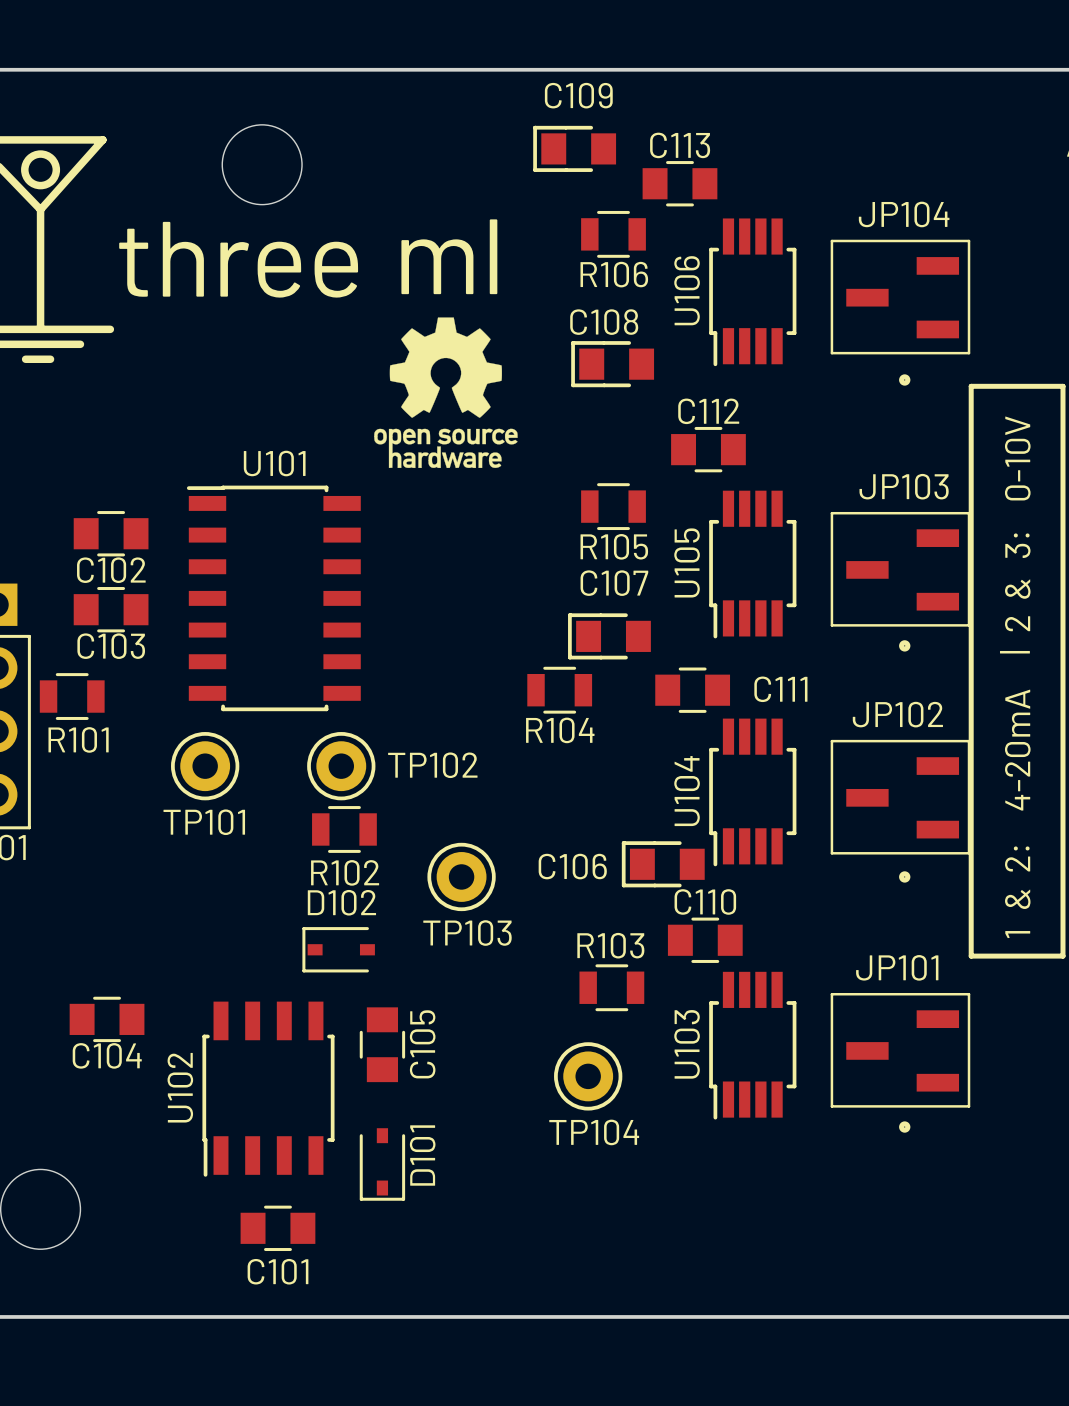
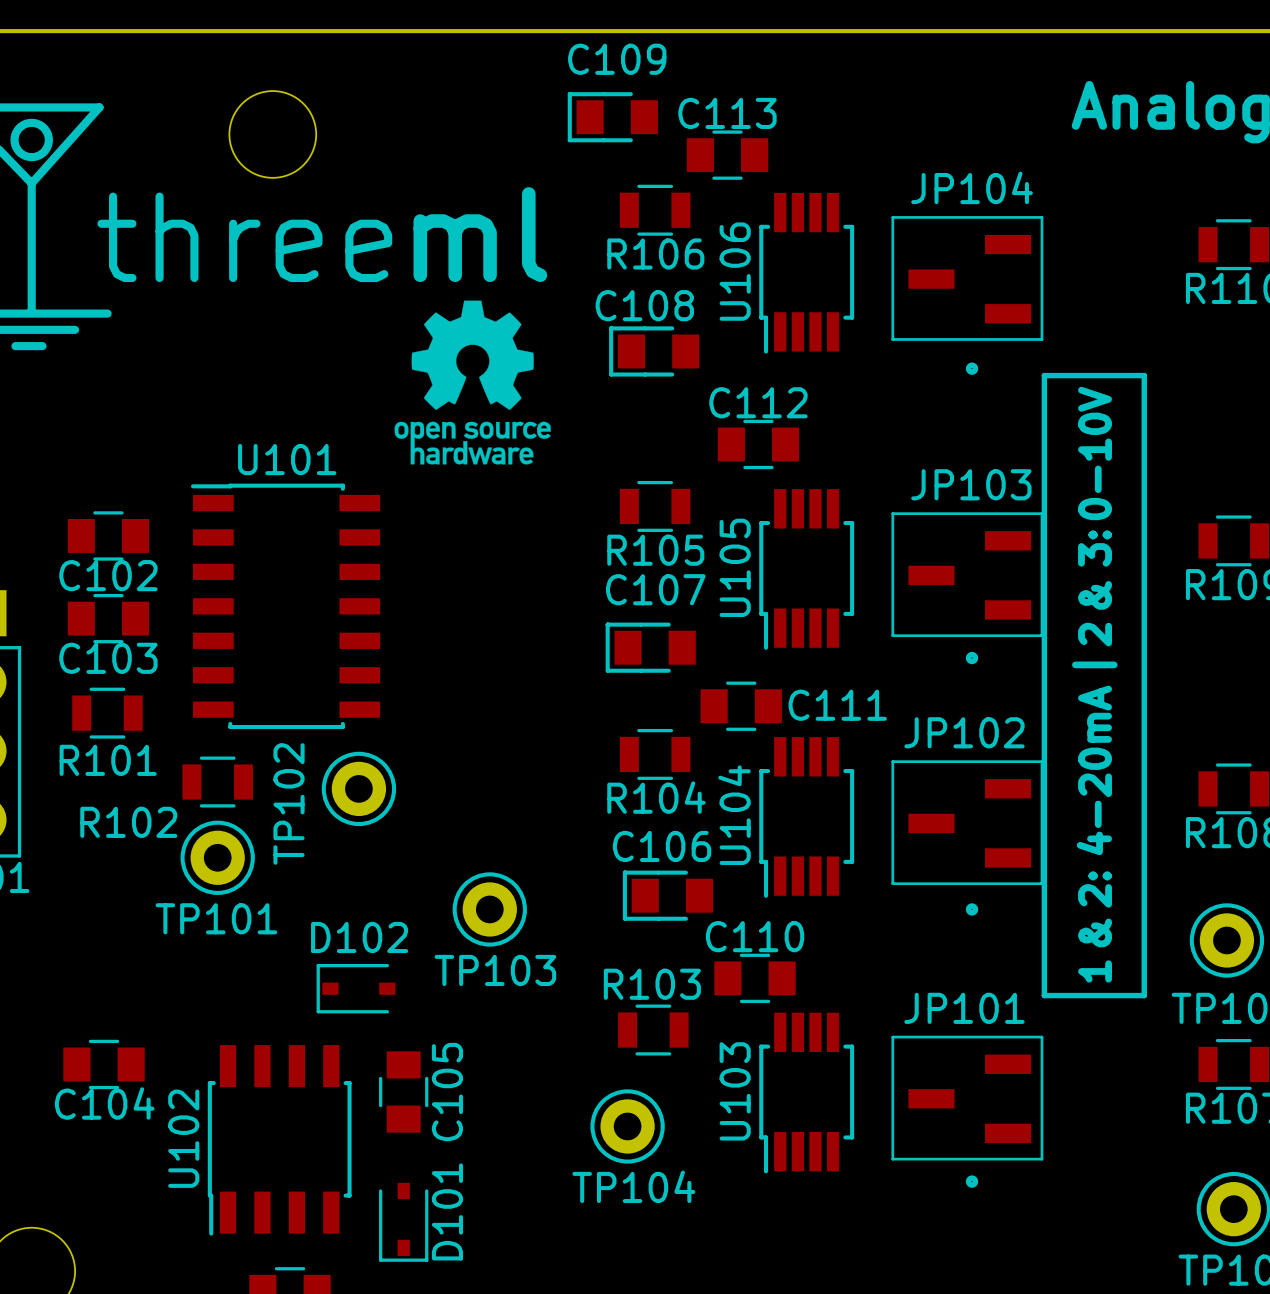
R104 position: (559, 690) -> (655, 754)
R101 position: (72, 696) -> (107, 713)
R101 name position: R101 (78, 739) -> R101 (108, 760)
TP102 name rotation: 0° (432, 765) -> 90° counterclockwise (289, 803)
TP102 name position: TP102 (432, 765) -> TP102 (289, 803)
TP101 position: (205, 766) -> (217, 857)
R102 position: (344, 829) -> (217, 782)
C106 position: (663, 864) -> (667, 895)
C106 name position: C106 (572, 866) -> C106 (662, 846)
R102 name position: R102 (345, 872) -> R102 (128, 822)

